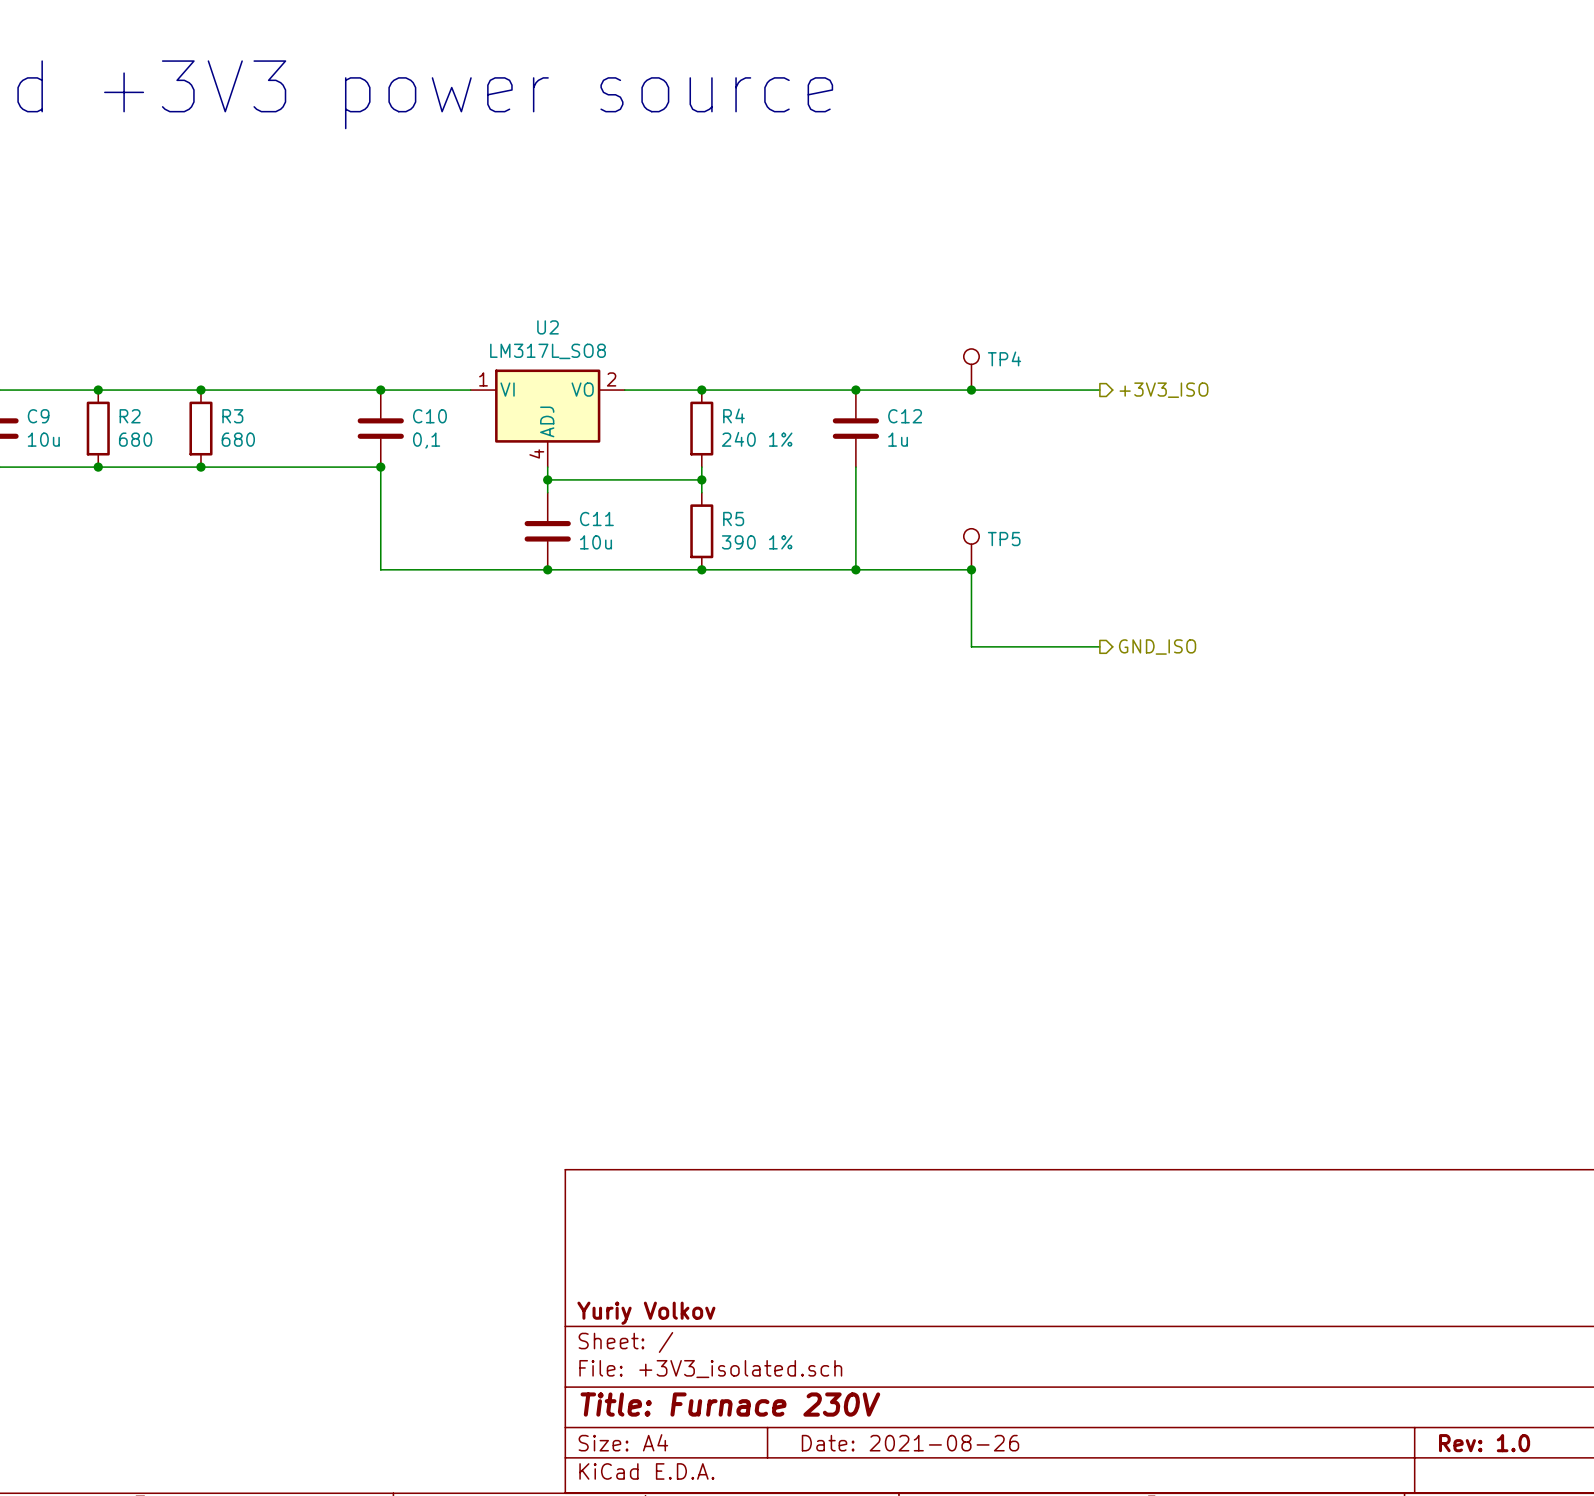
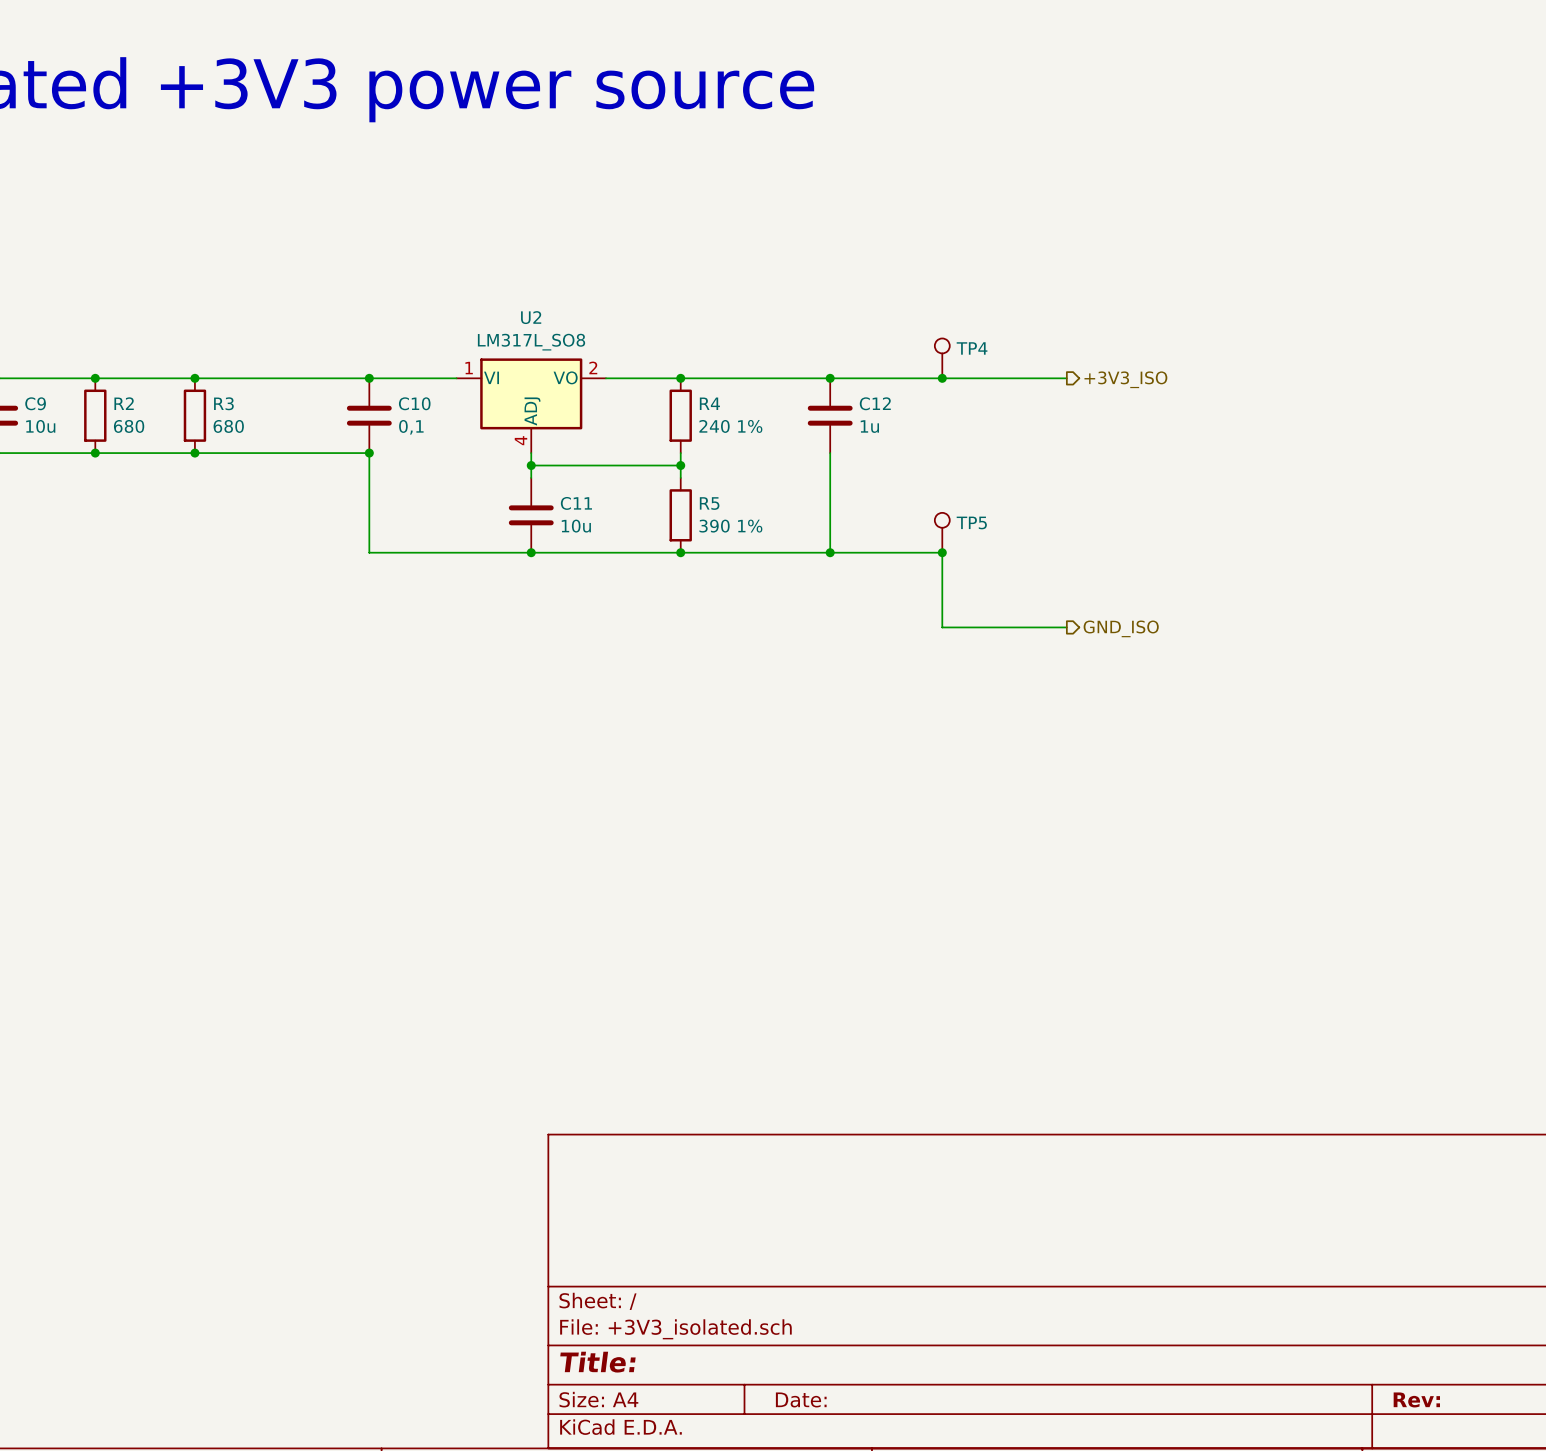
title block: Yuriy Volkov (646, 1313) -> none
title block: Title: Furnace 230V (730, 1404) -> Title: (597, 1362)
title block: Date: 2021-08-26 (910, 1443) -> Date: (801, 1399)
title block: Rev: 1.0 (1484, 1443) -> Rev: (1416, 1399)

